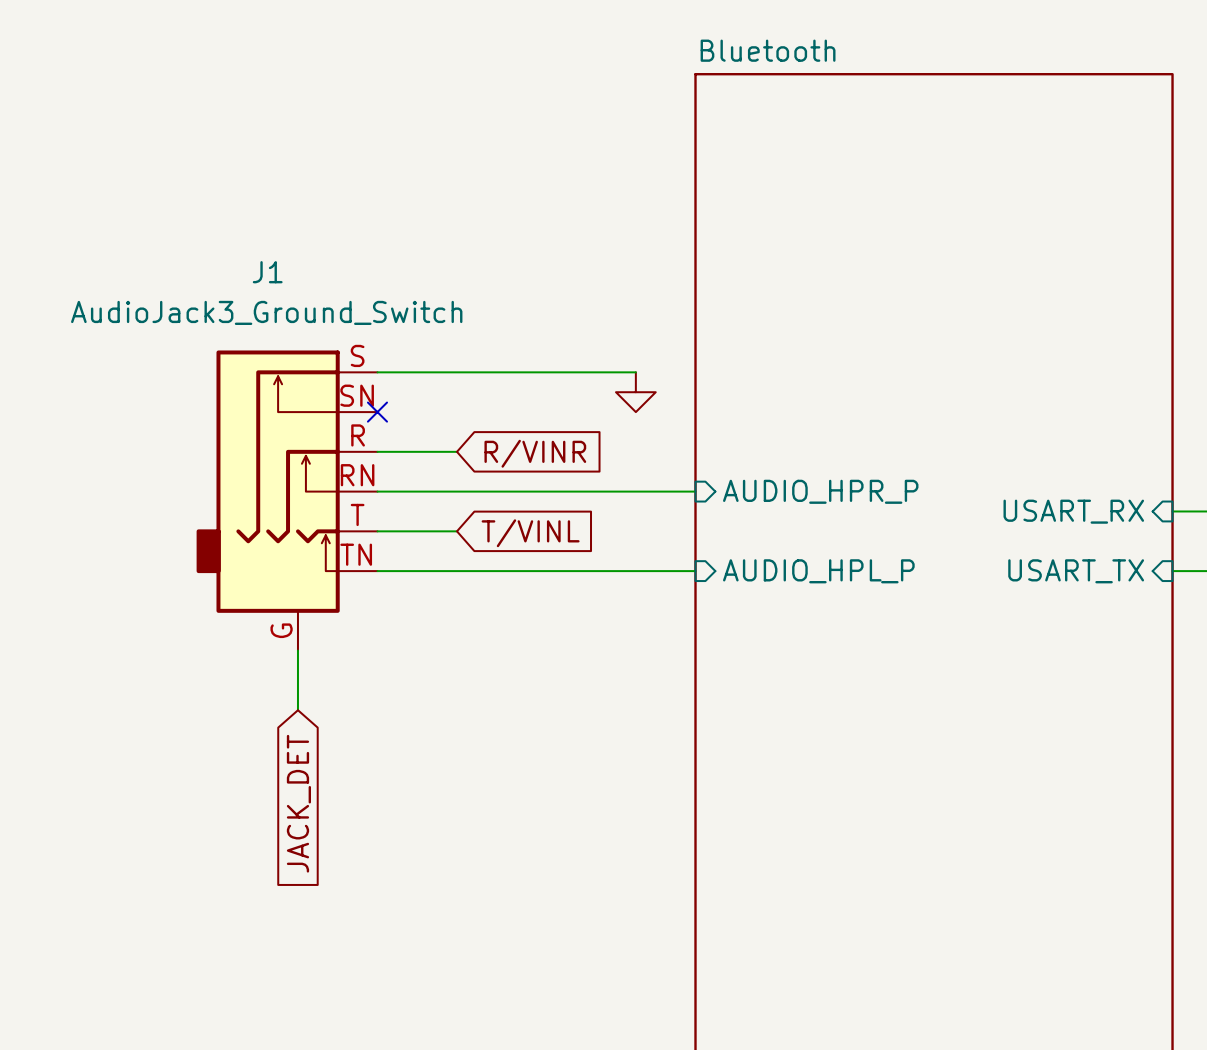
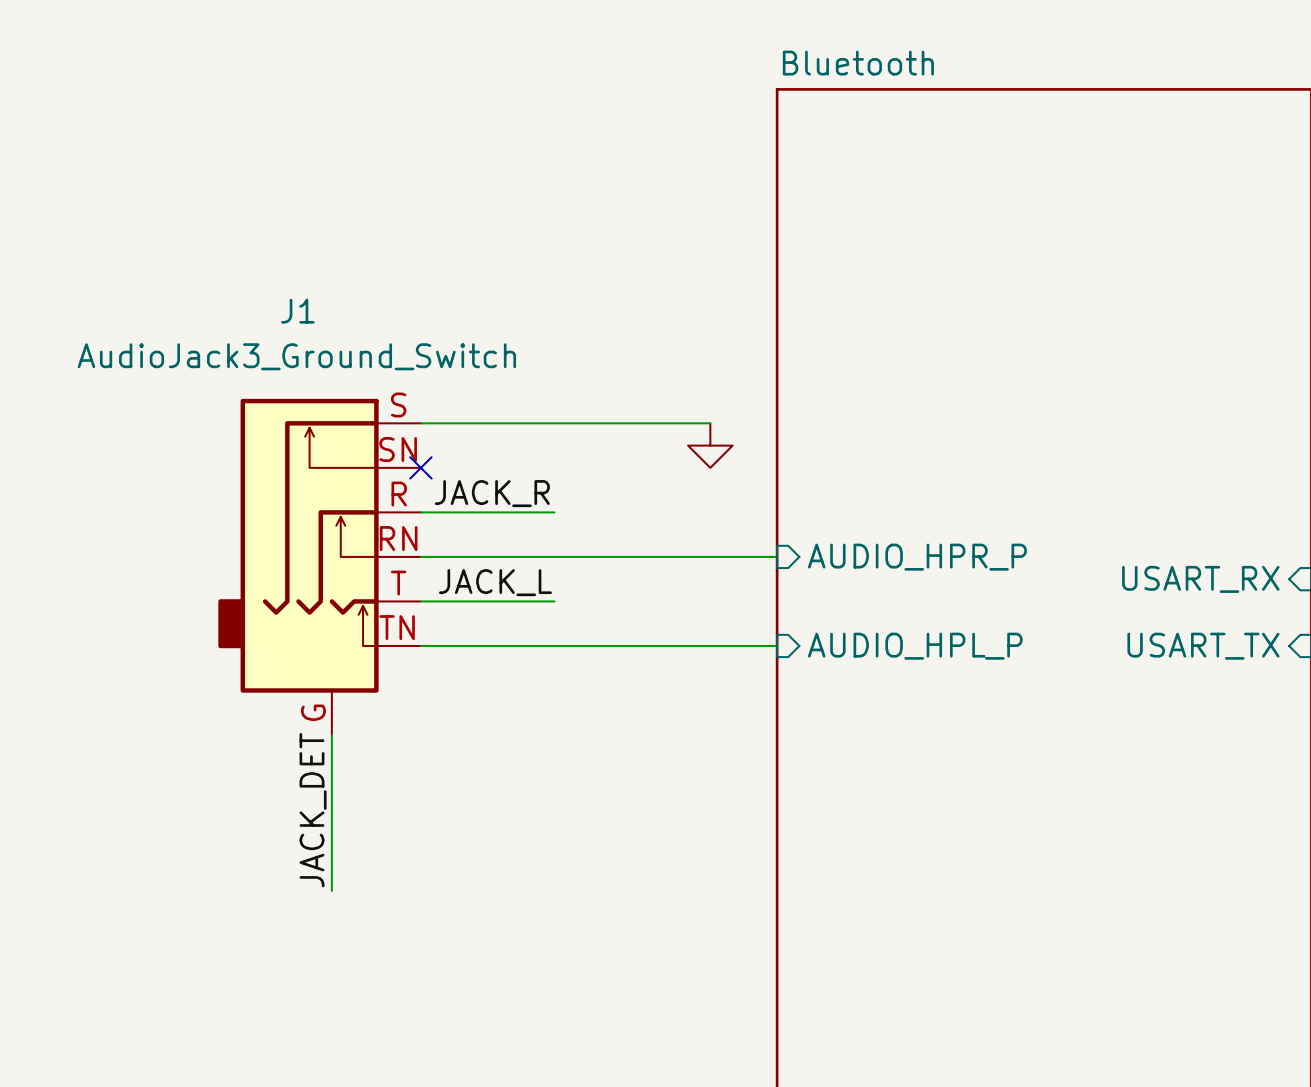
label: none -> JACK_R (492, 493)
wire: none -> (509, 512) (554, 512)
global label: R/VINR (535, 453) -> none
label: none -> JACK_L (495, 582)
wire: none -> (509, 601) (554, 601)
global label: T/VINL (530, 533) -> none
wire: none -> (331, 801) (331, 890)
label: none -> JACK_DET (313, 810)
global label: JACK_DET (298, 803) -> none

